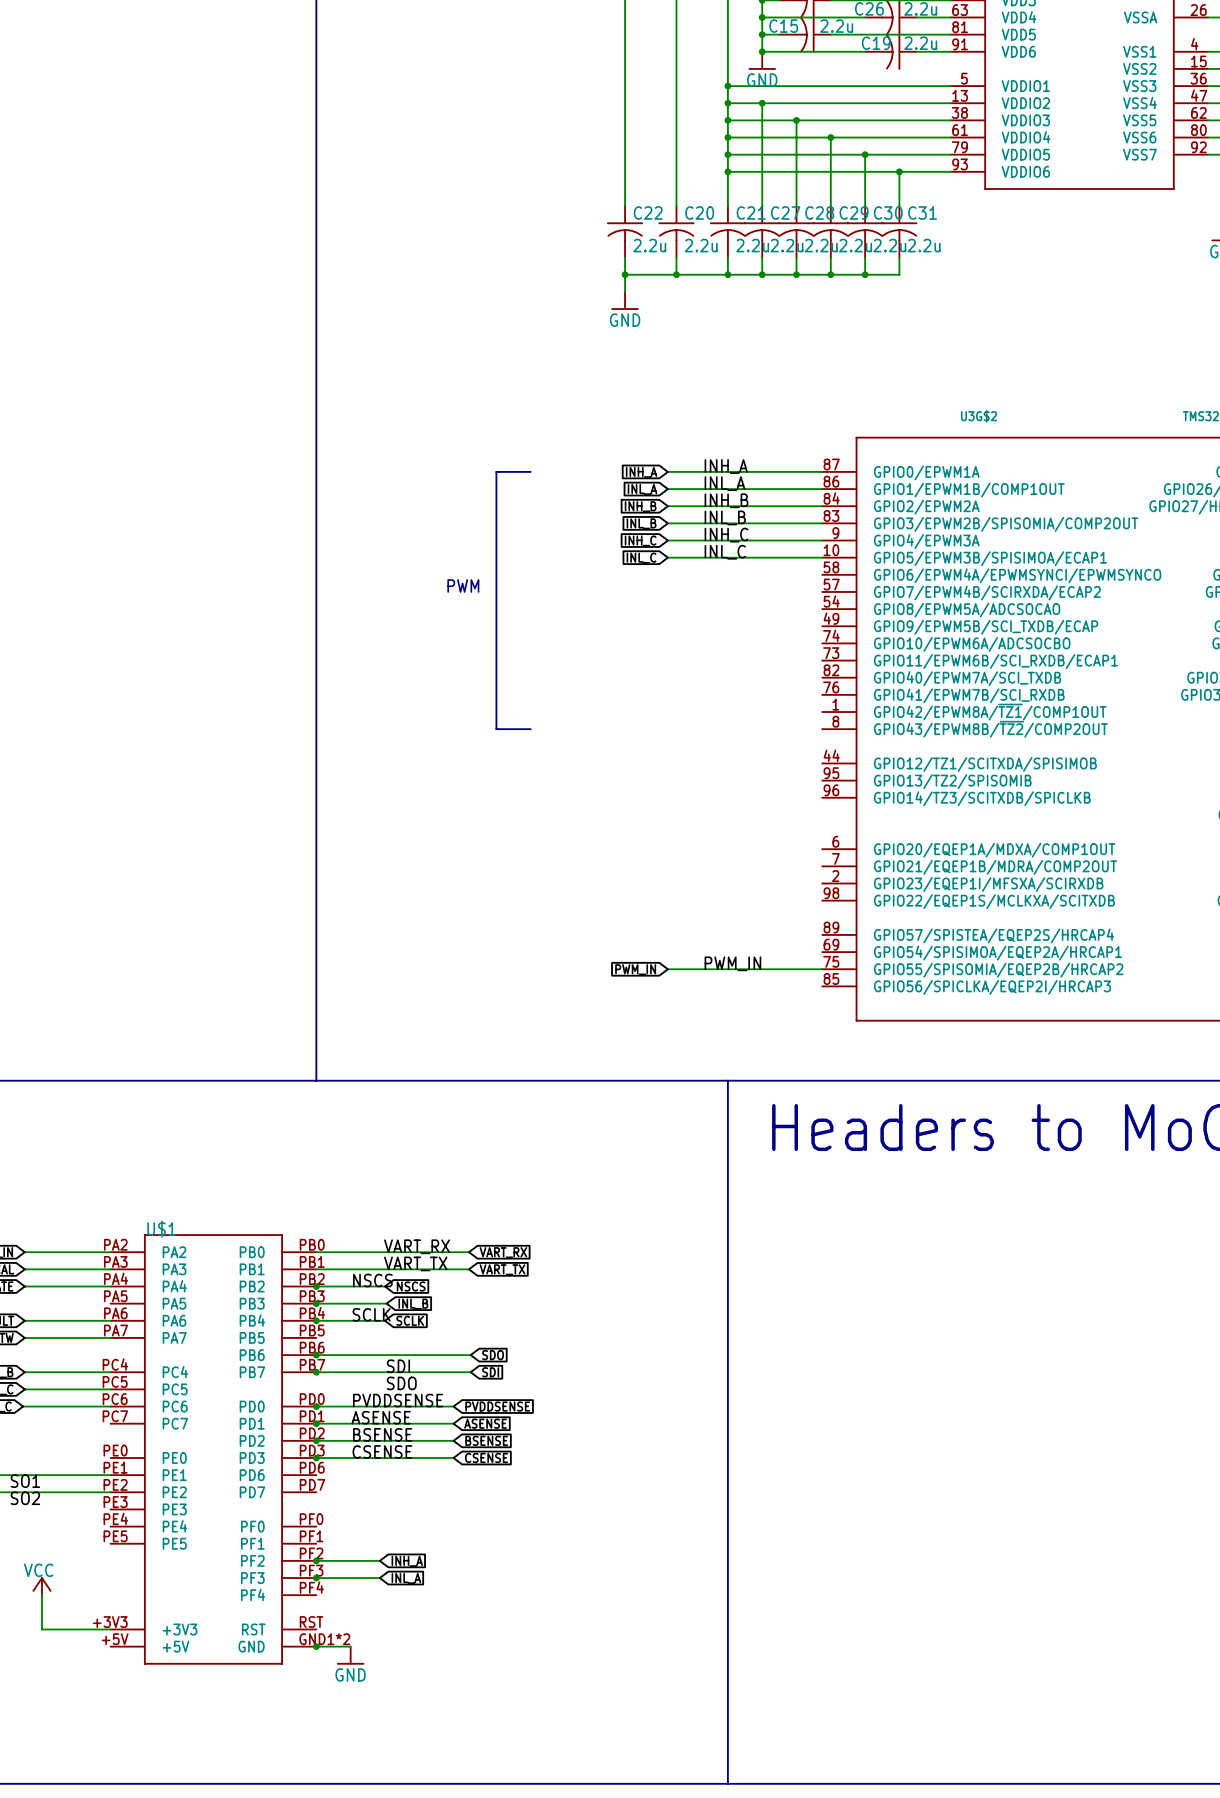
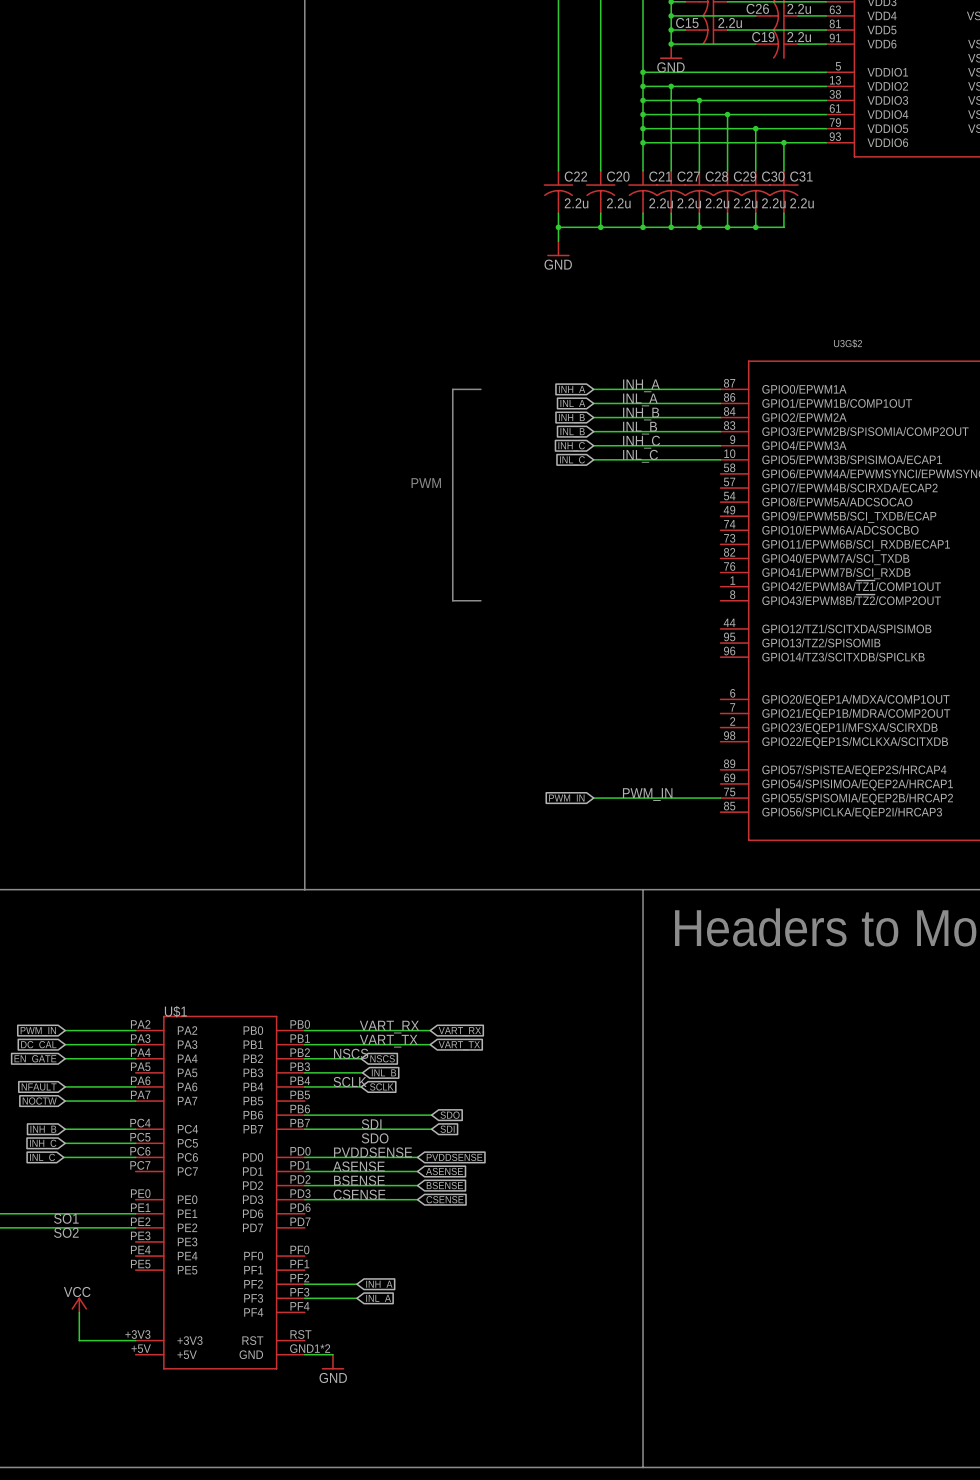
junction: (316, 1286) -> none
junction: (316, 1303) -> none
junction: (316, 1320) -> none
junction: (316, 1355) -> none
junction: (316, 1372) -> none
junction: (316, 1406) -> none
junction: (316, 1423) -> none
junction: (316, 1440) -> none
junction: (316, 1457) -> none
junction: (316, 1560) -> none
junction: (316, 1578) -> none
junction: (316, 1646) -> none

